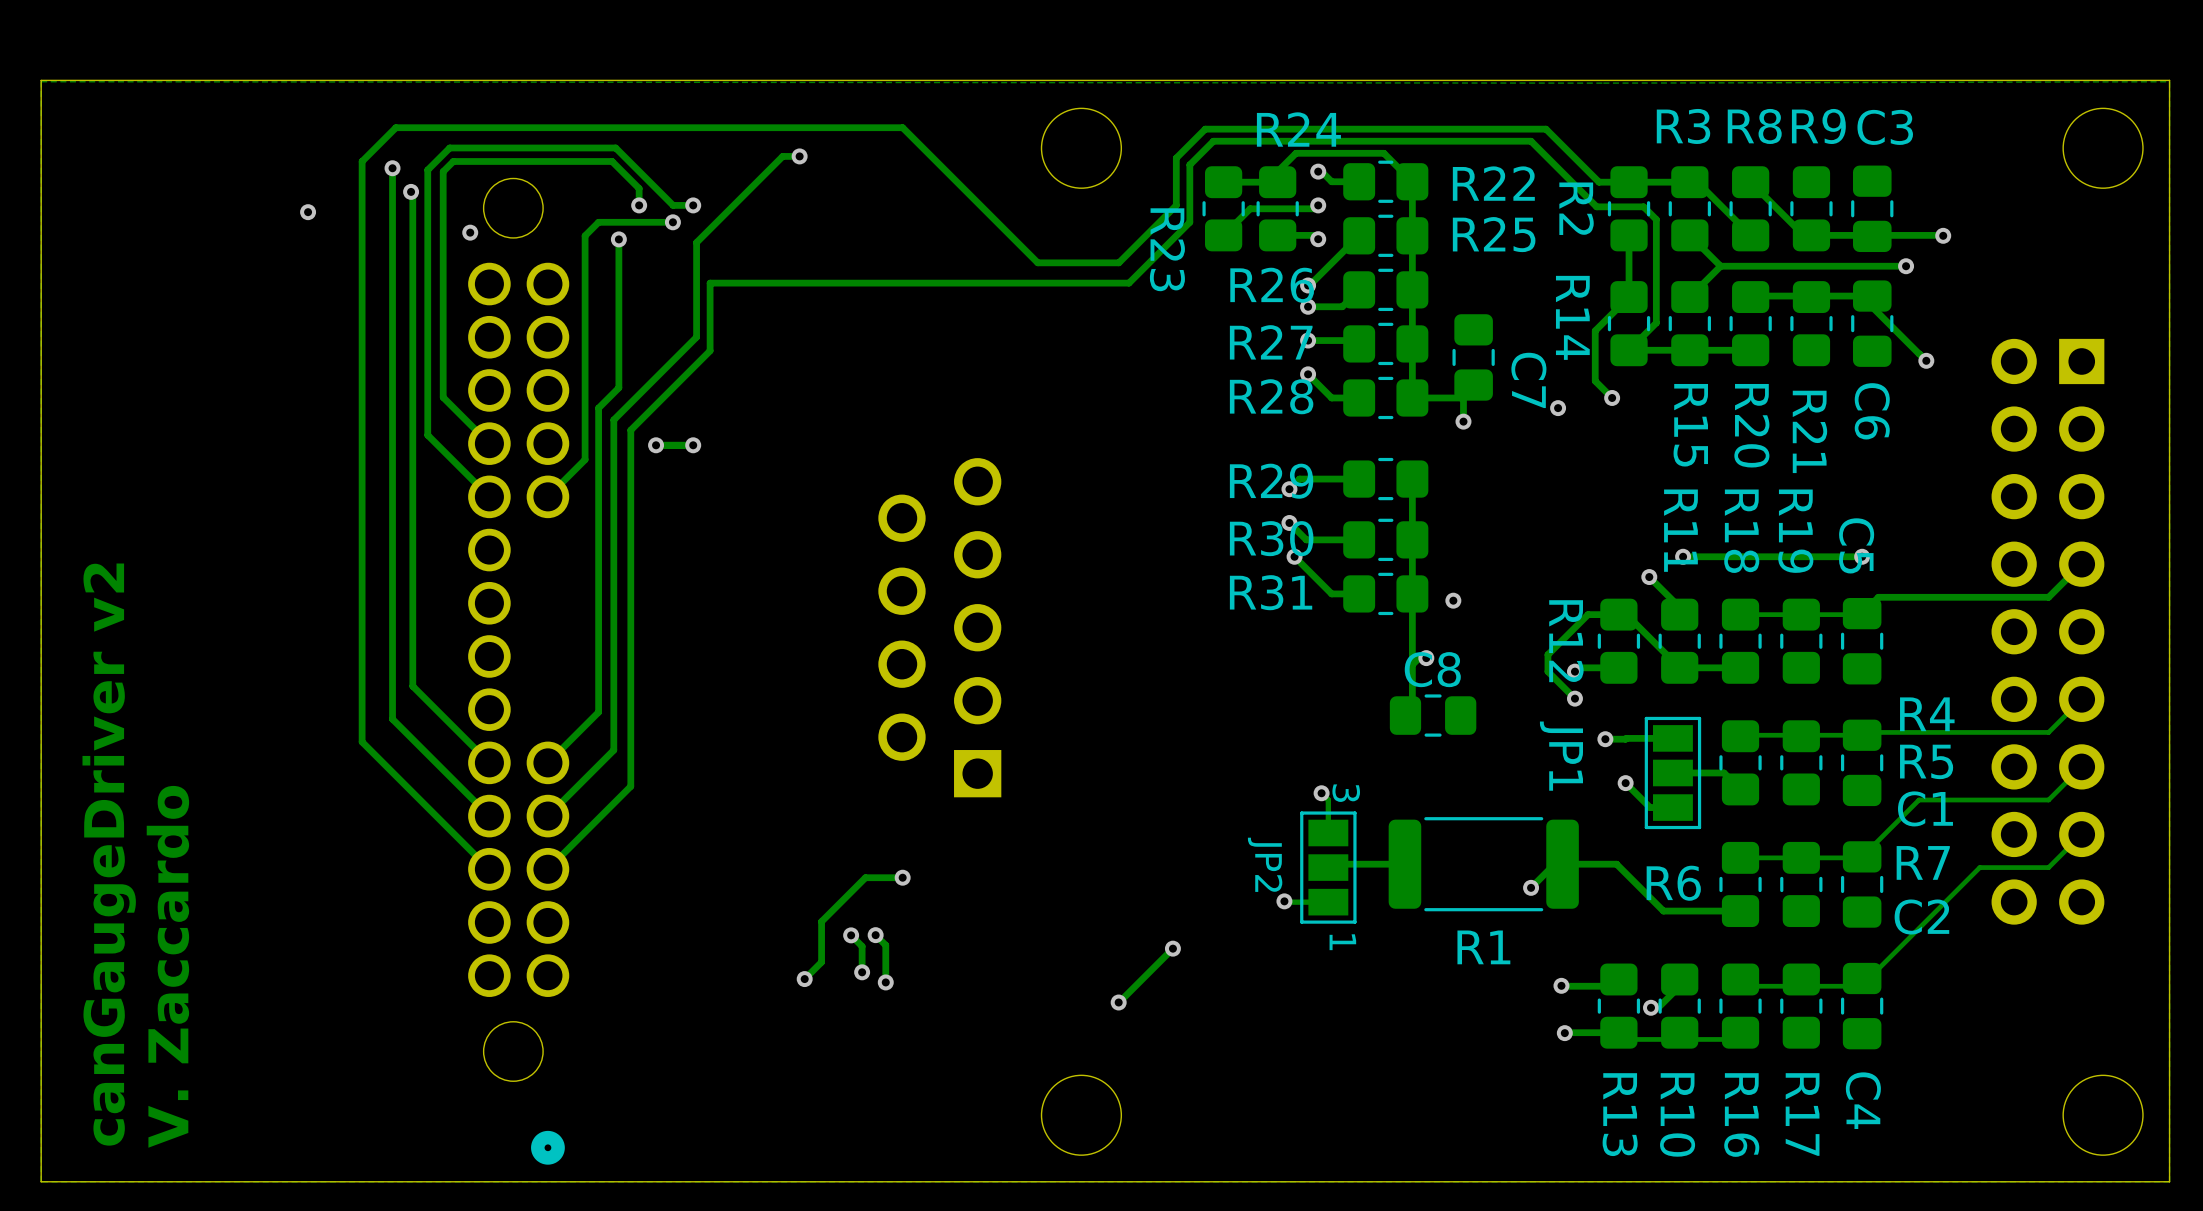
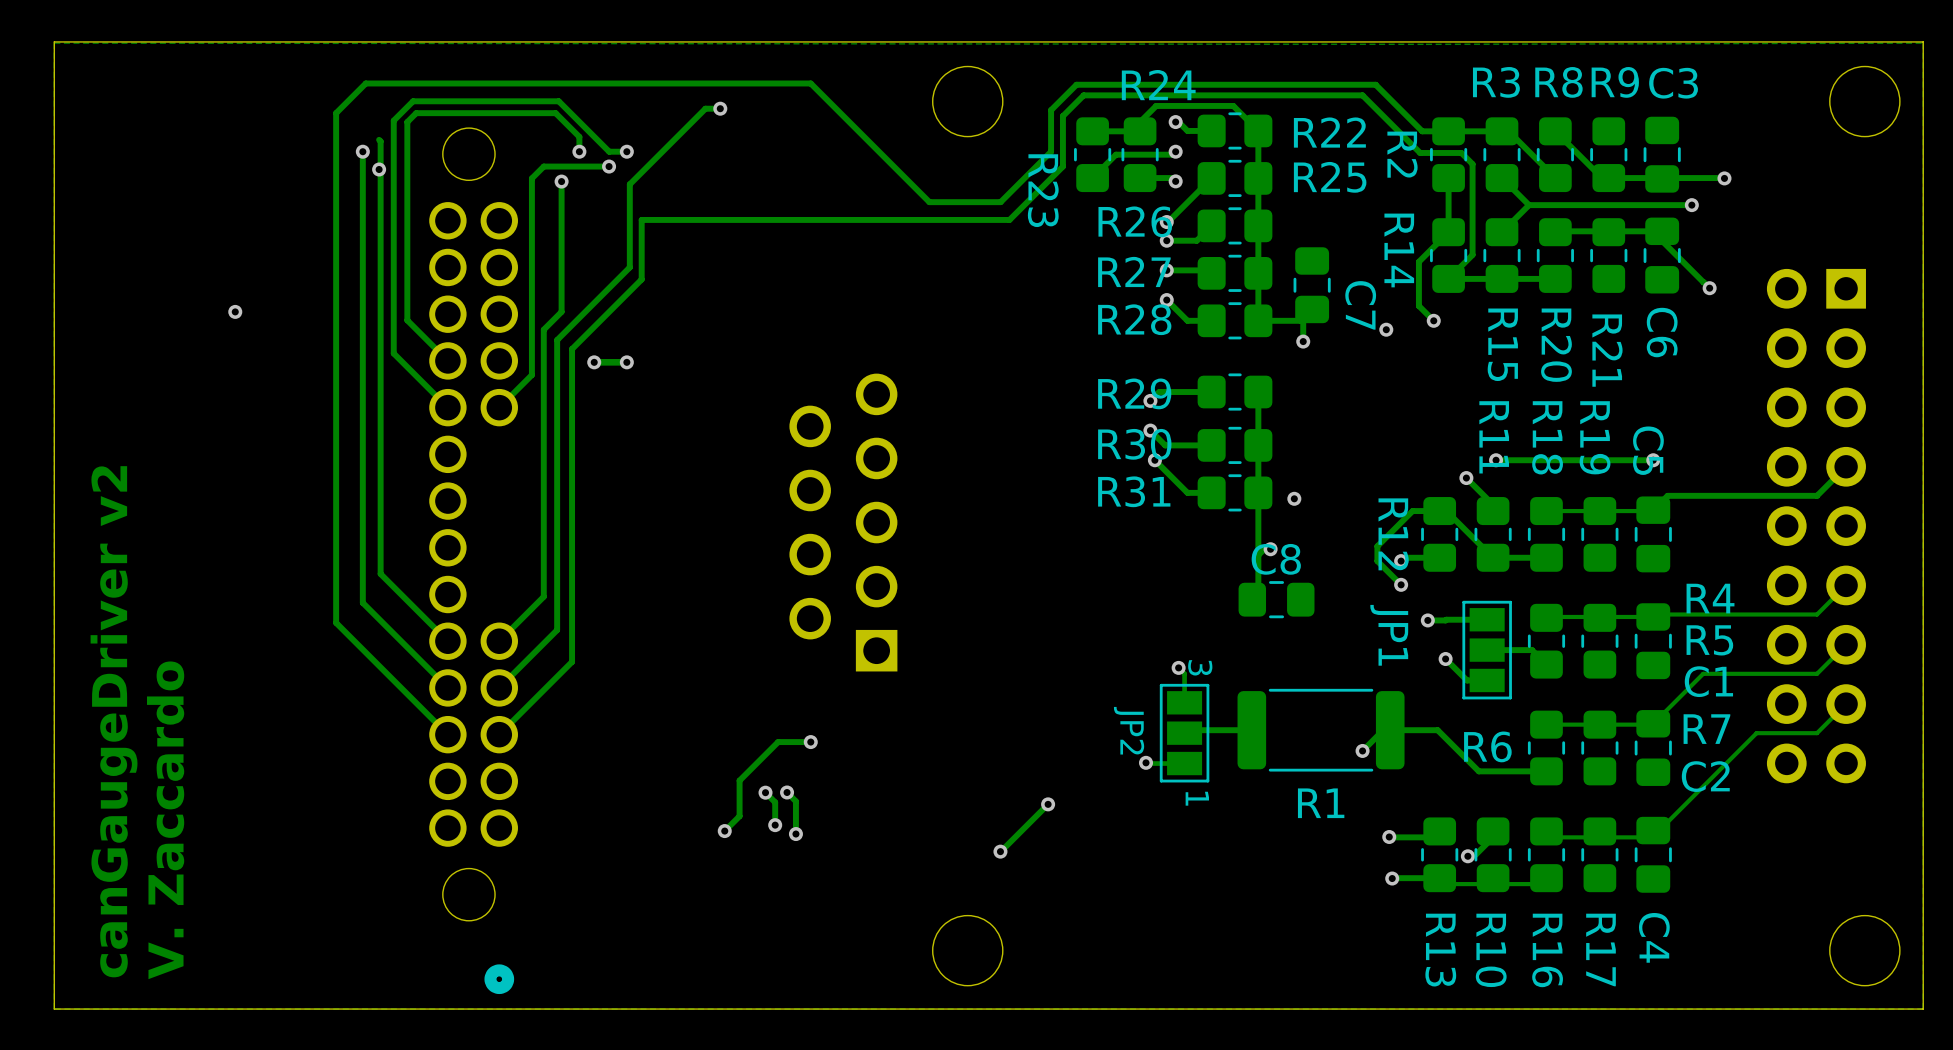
track: (392, 168) (392, 205) -> none
via: (392, 168) -> none
via: (411, 191) -> none
via: none -> (362, 151)
via: (308, 212) -> none
via: none -> (379, 169)
via: (470, 232) -> none
via: none -> (235, 311)

